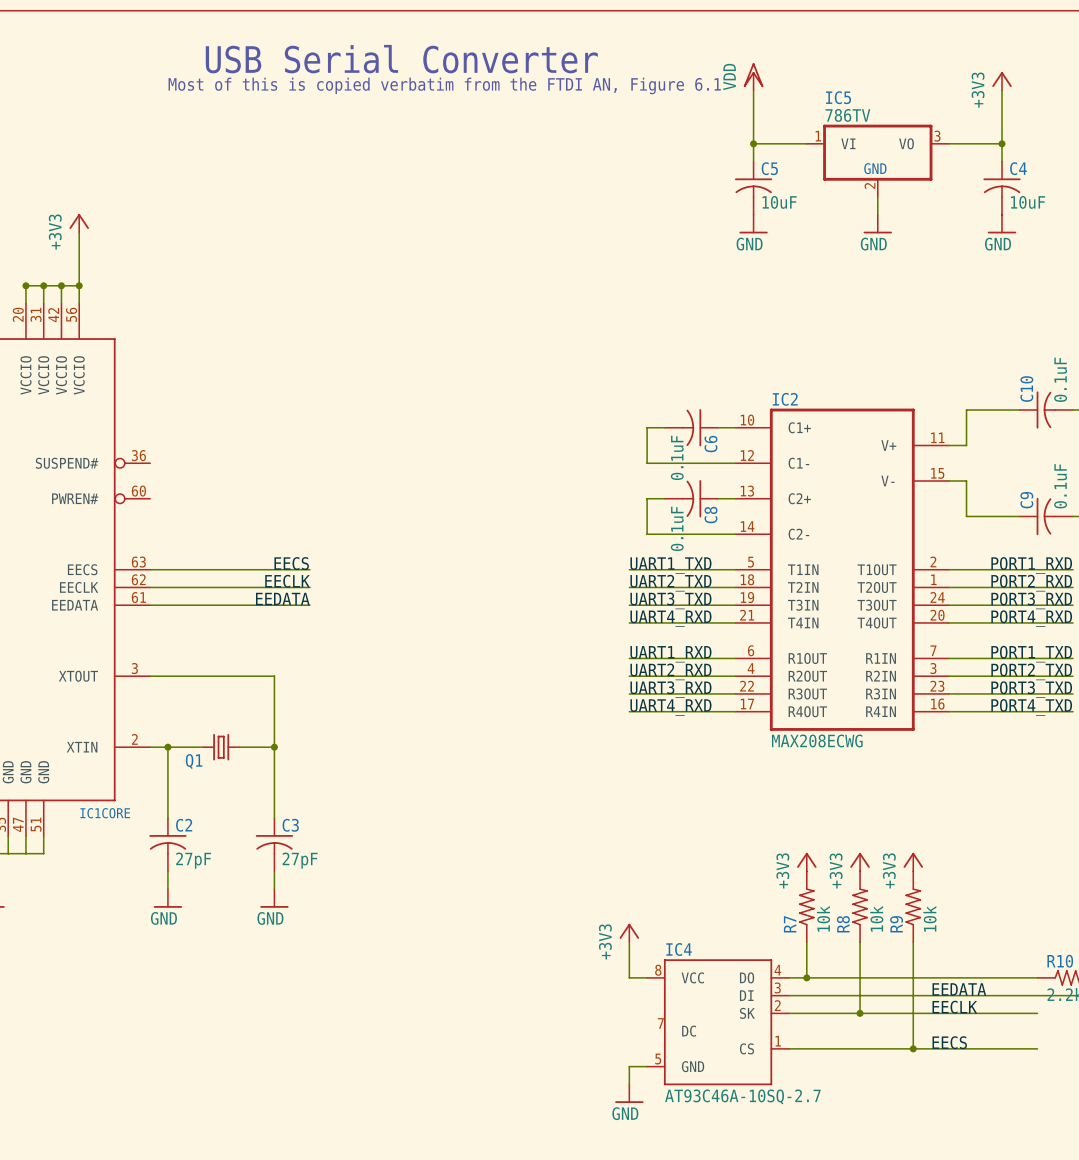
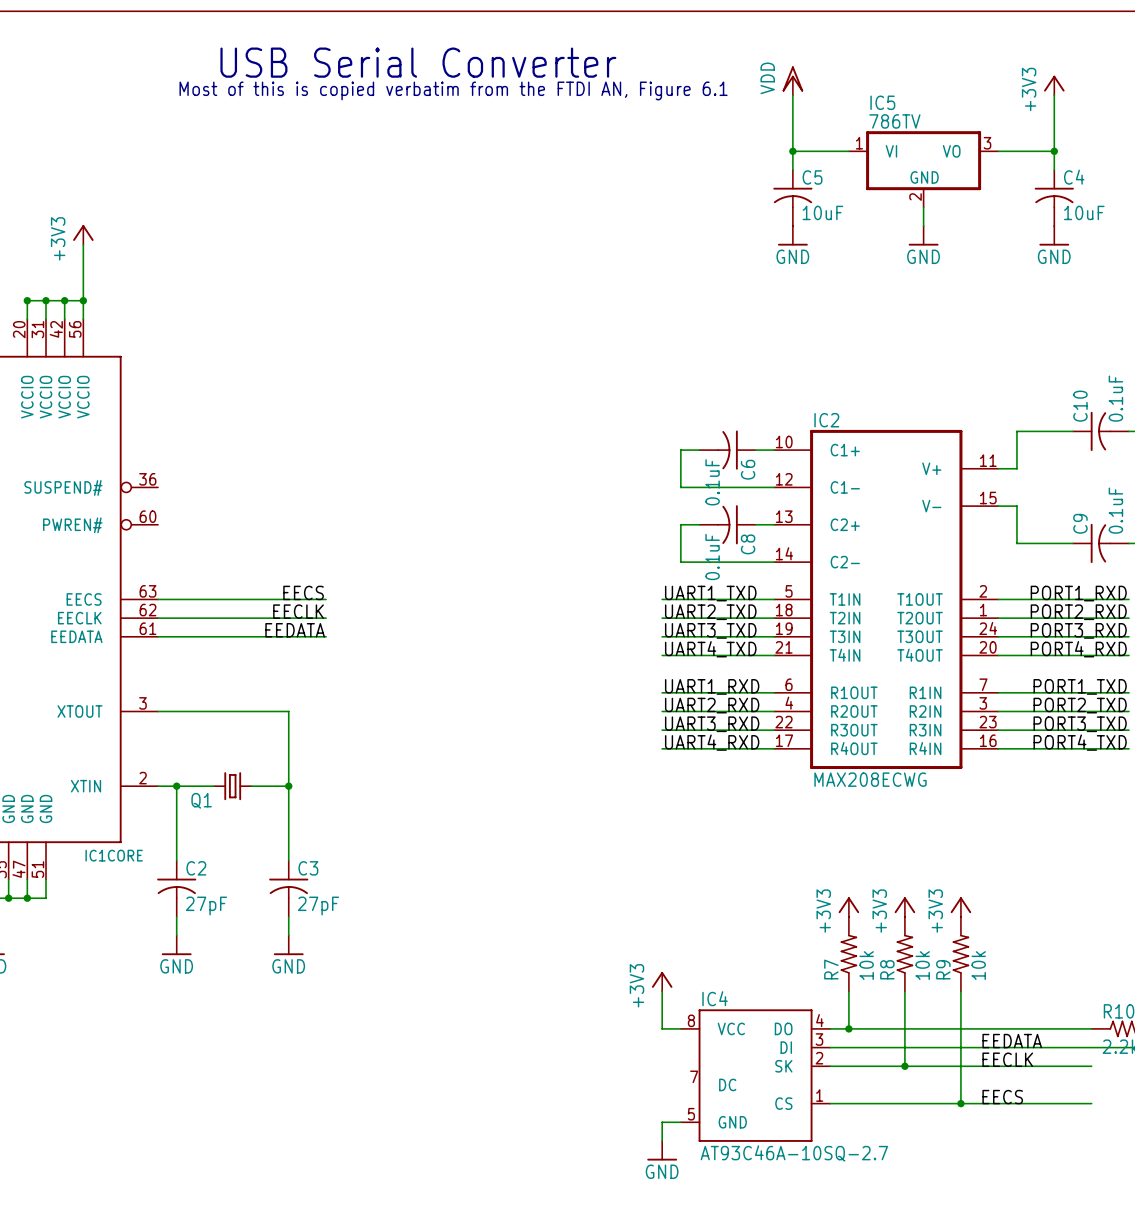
label: UART4_RXD (670, 618) -> UART4_TXD (710, 649)
junction: none -> (8, 898)
junction: none -> (27, 898)

